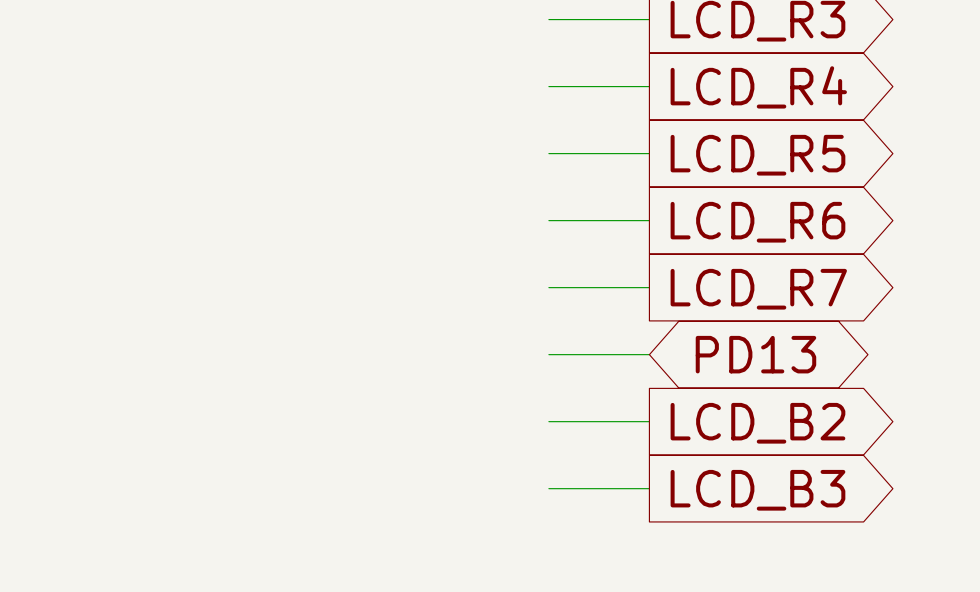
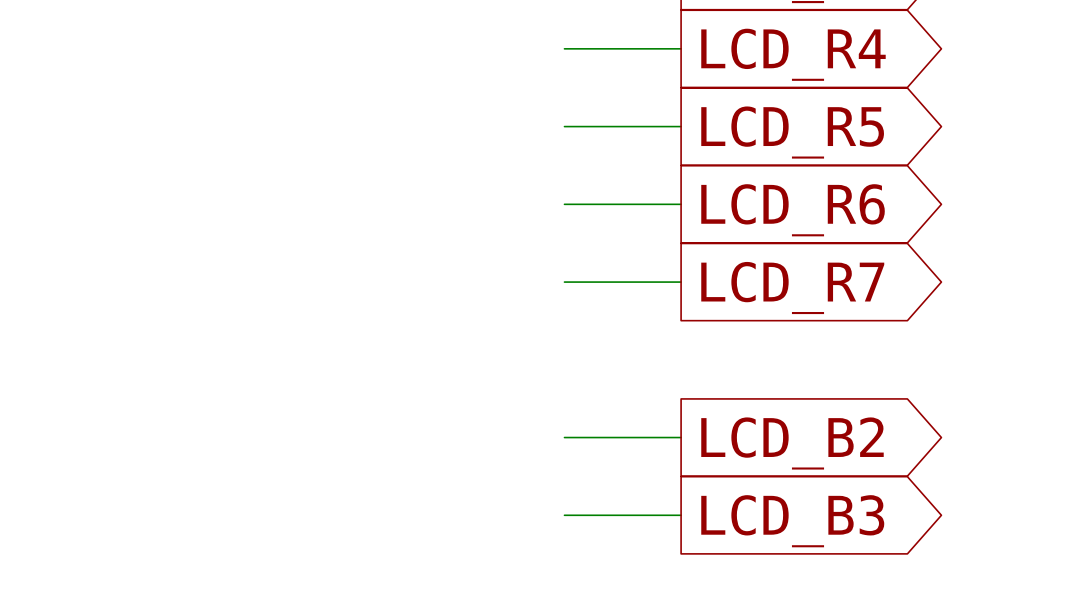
wire: (548, 354) (649, 354) -> none
global label: PD13 (755, 354) -> none

